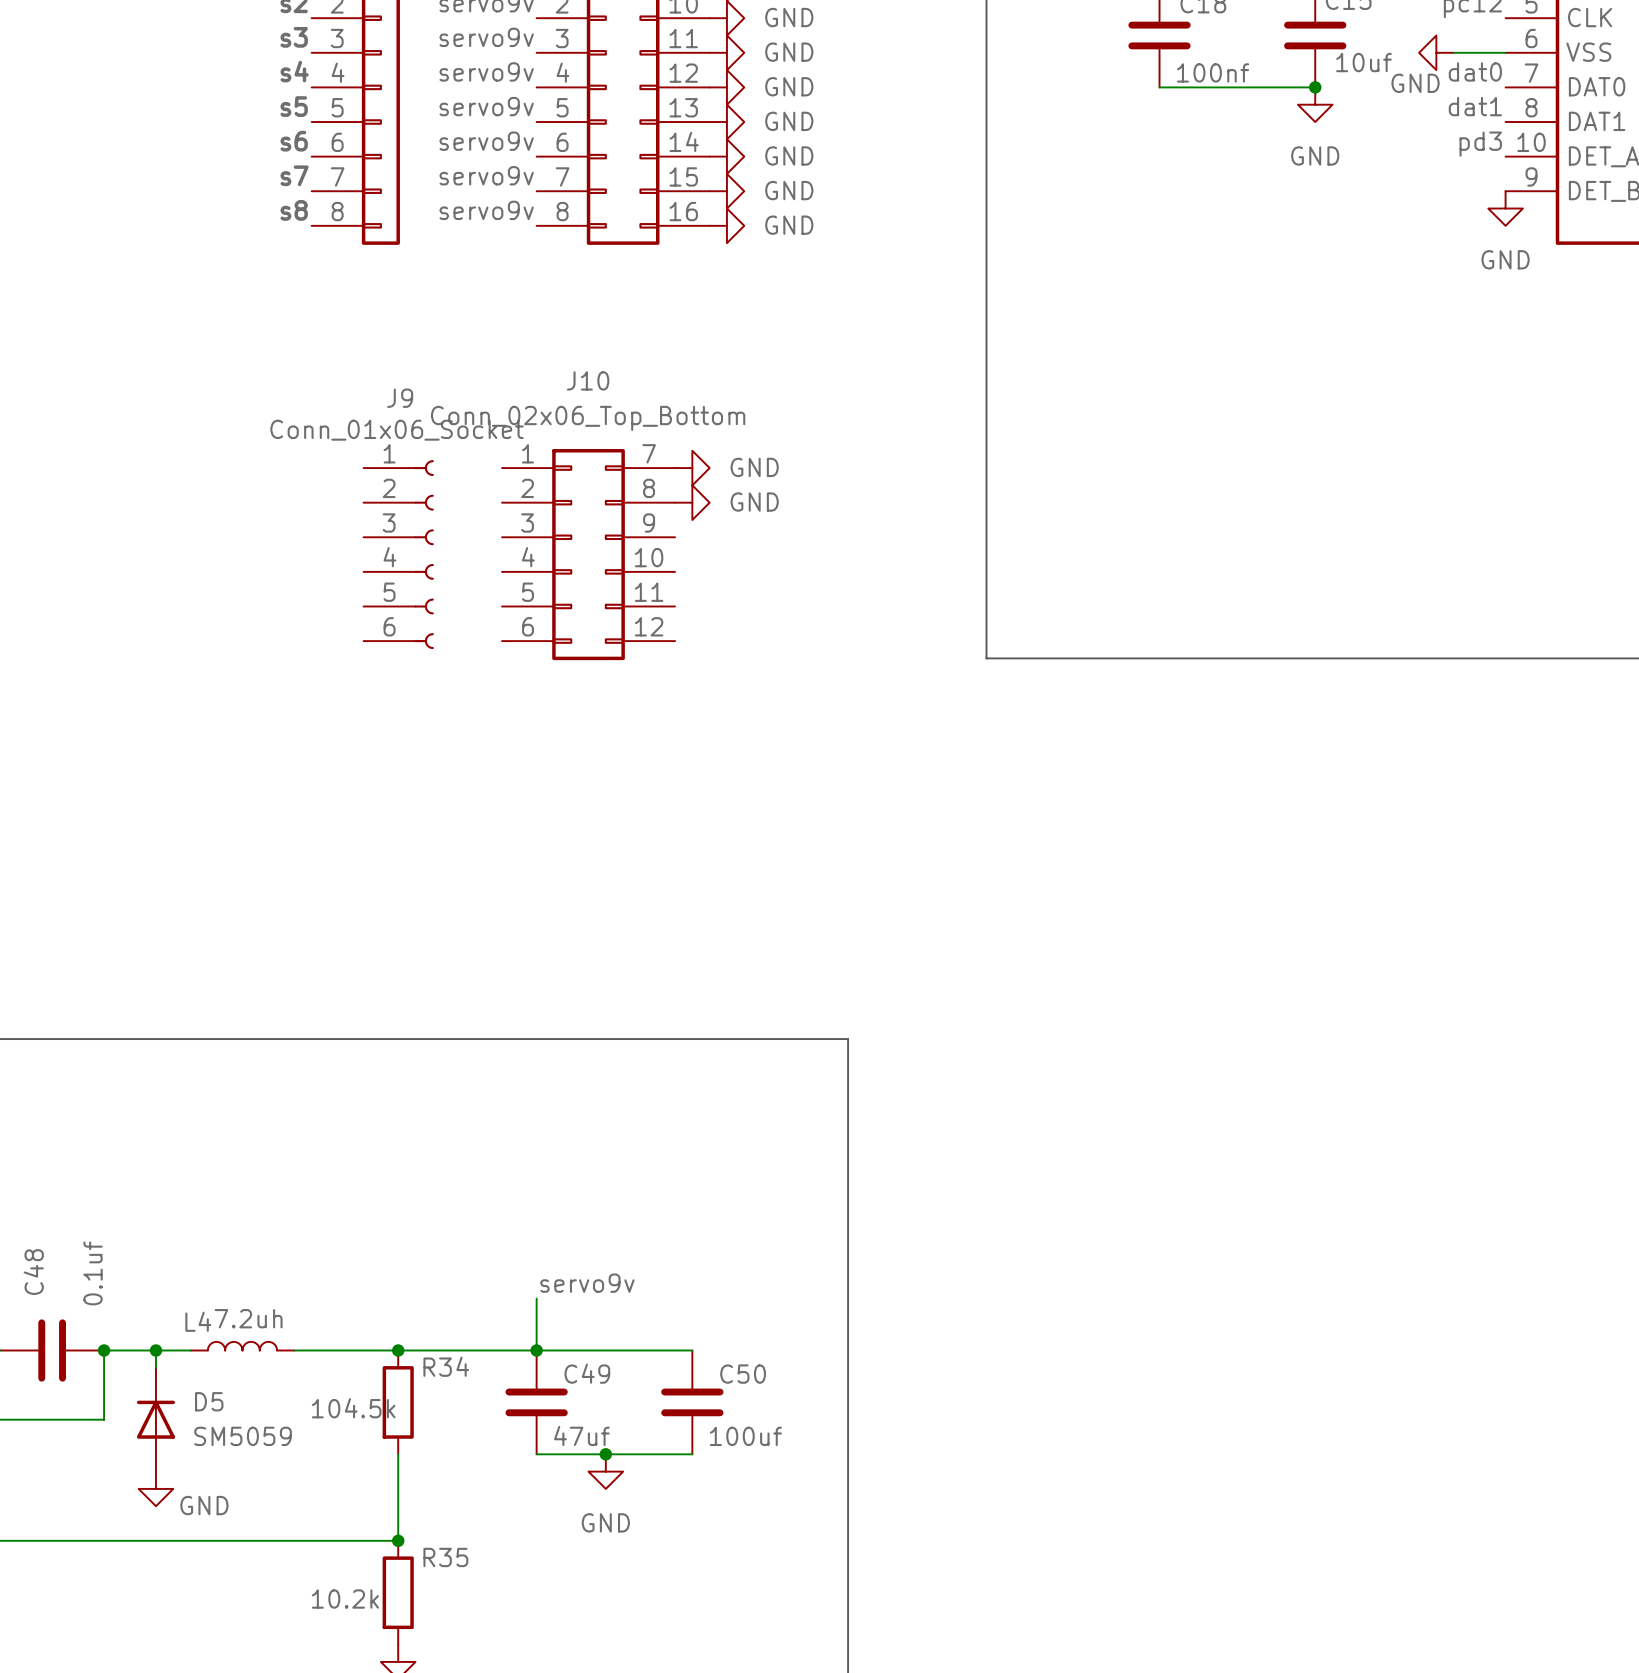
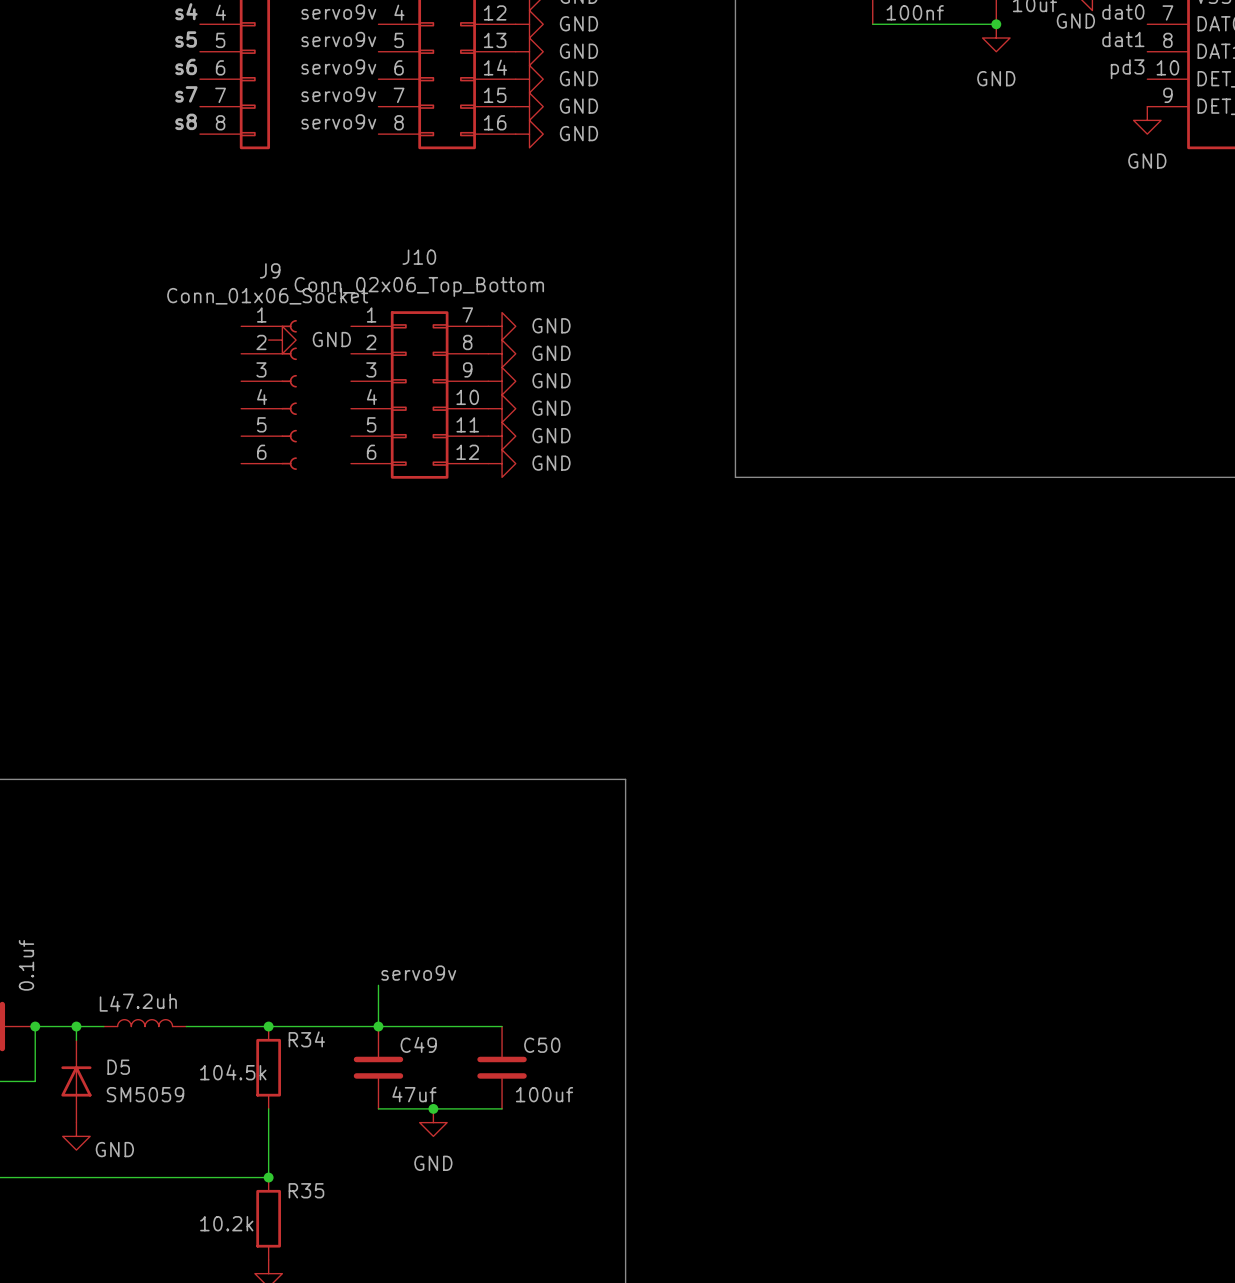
power symbol: none -> GND (282, 340)
power symbol: none -> GND (502, 381)
power symbol: none -> GND (502, 408)
power symbol: none -> GND (502, 436)
power symbol: none -> GND (502, 463)

